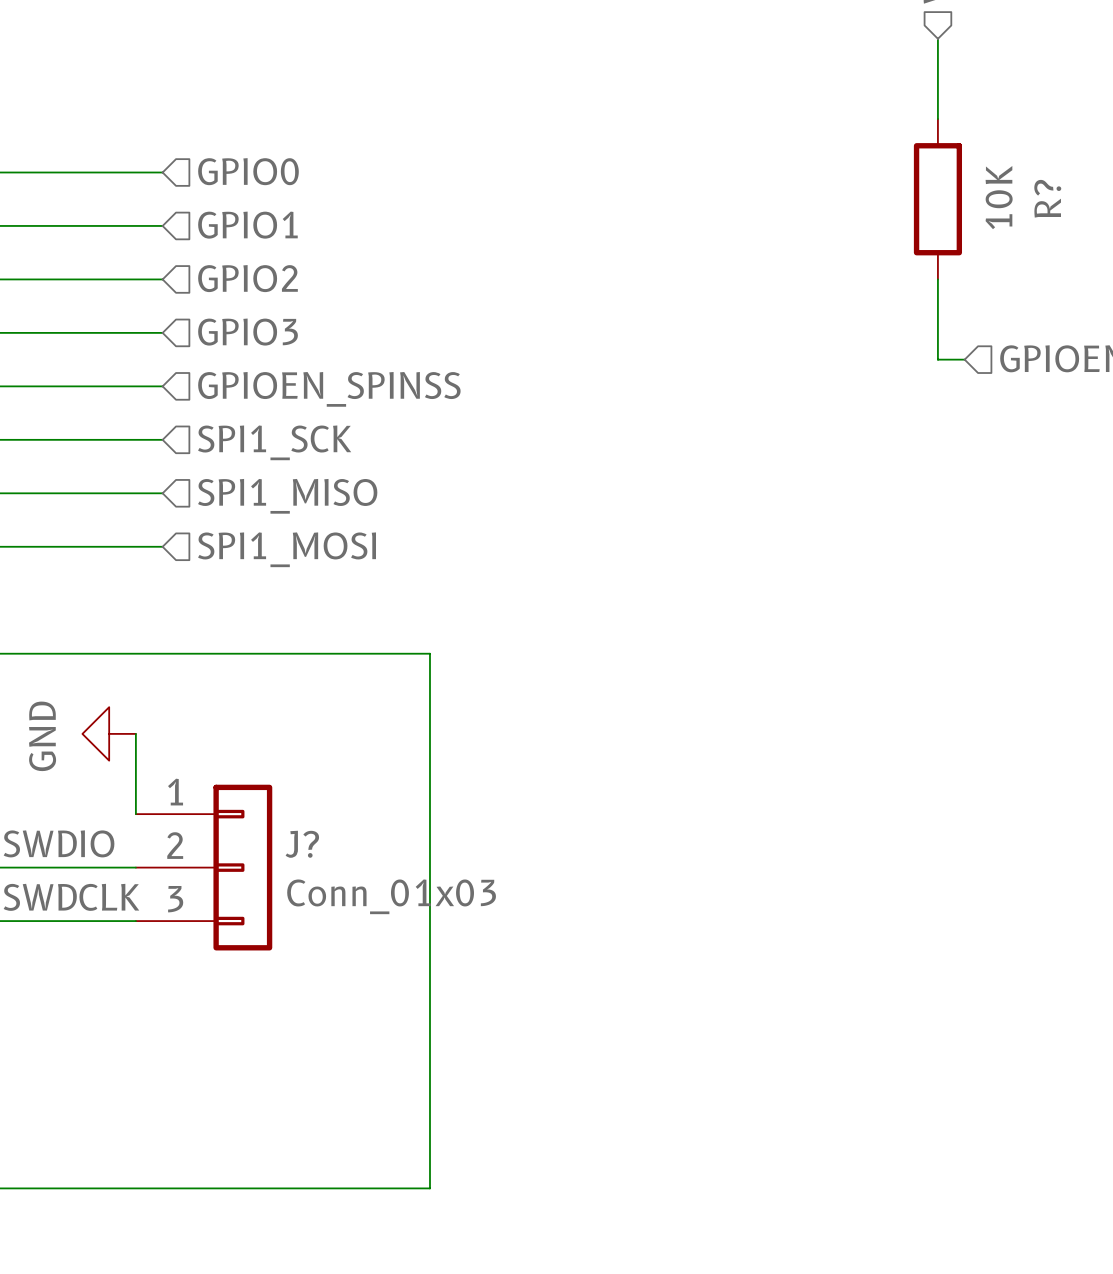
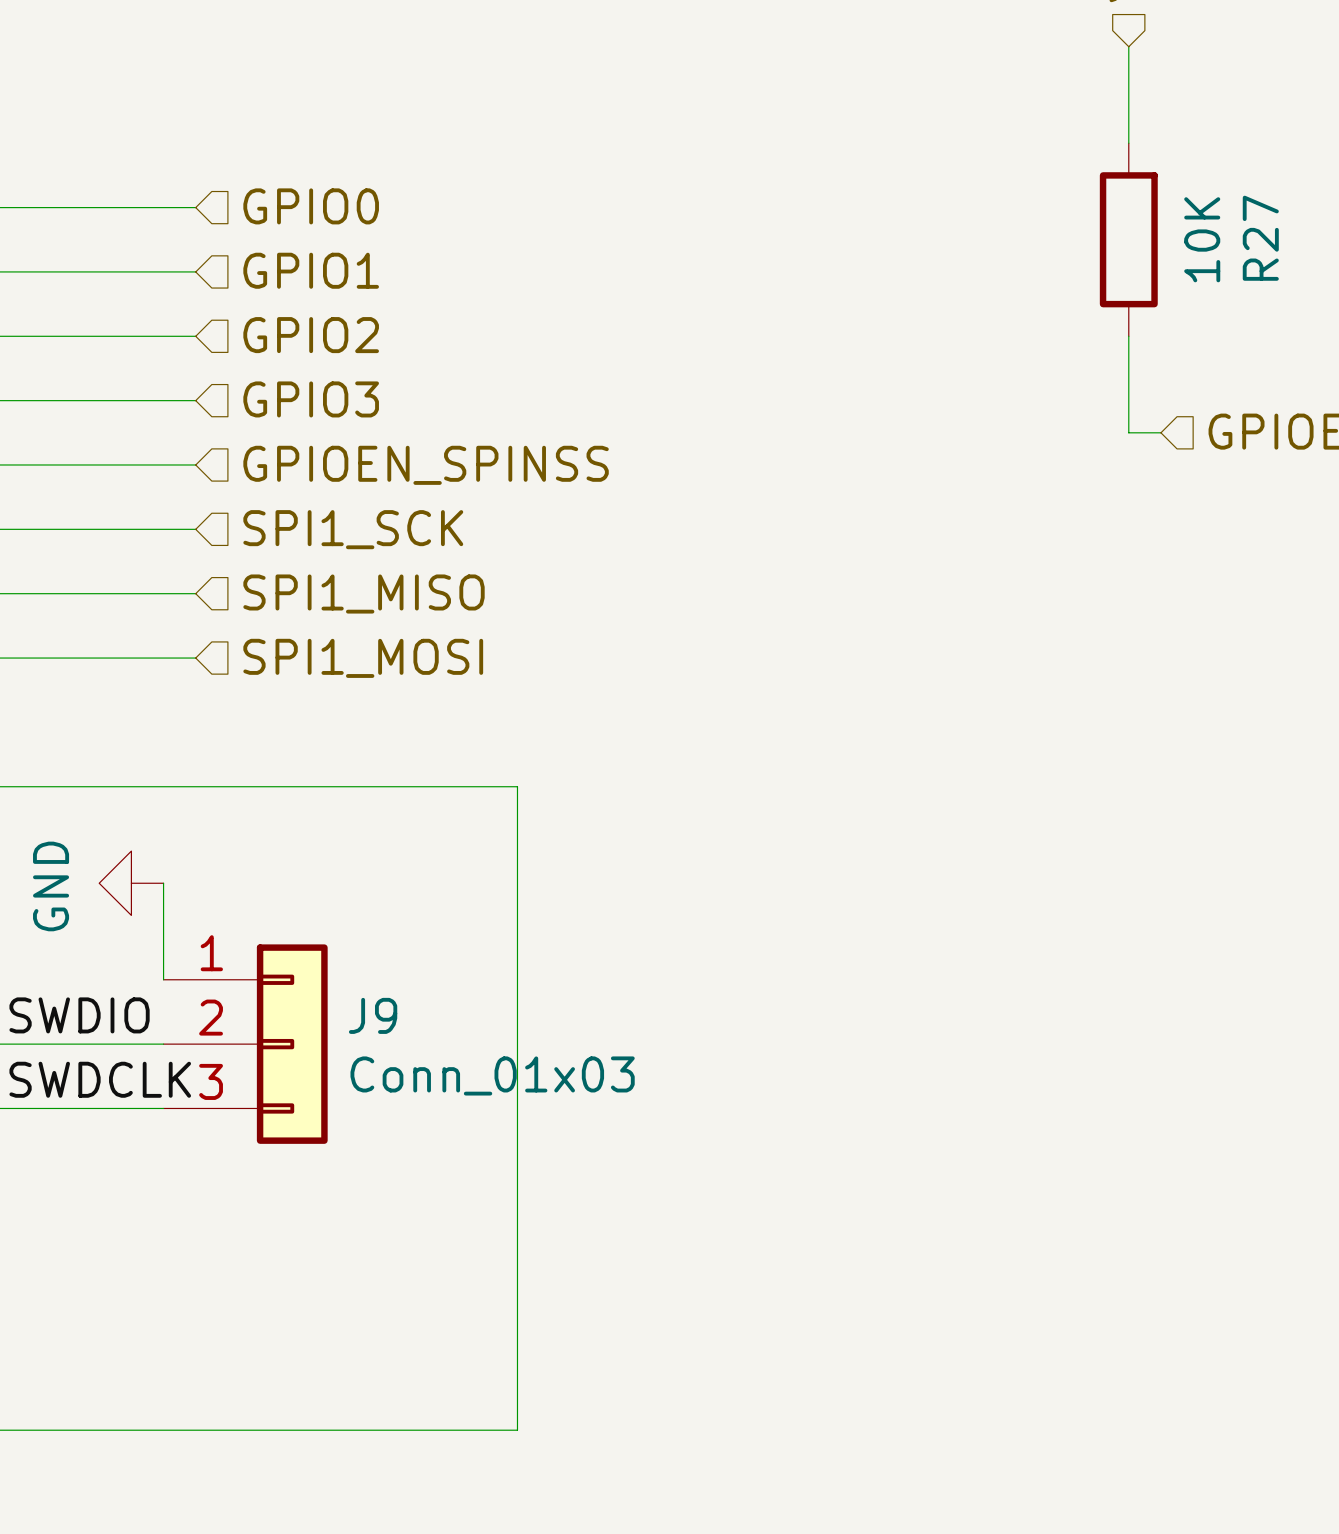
R? name: R? (1047, 198) -> R27 (1260, 238)
J? name: J? (302, 844) -> J9 (373, 1015)

